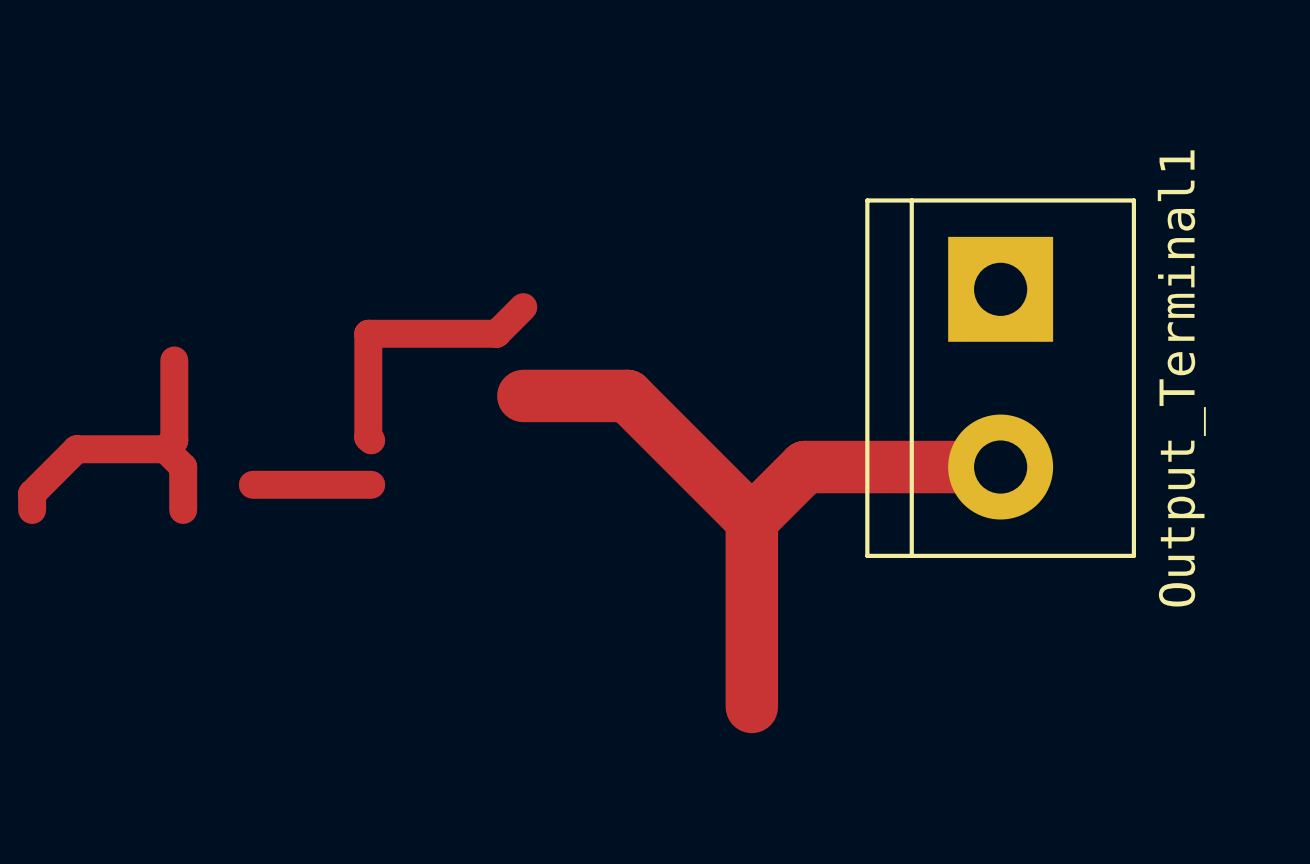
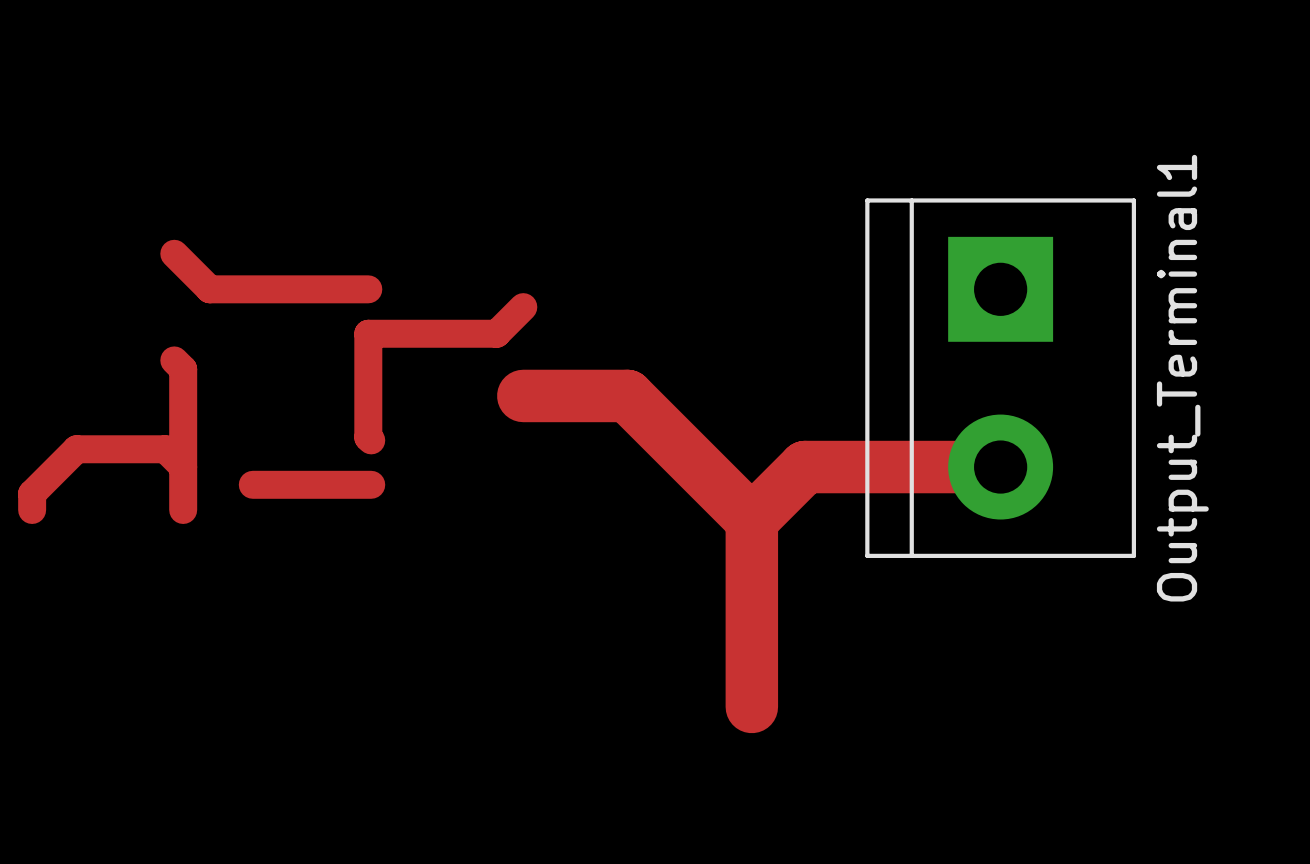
top track: none -> (174, 253) (209, 289) (368, 289)
top track: (174, 360) (174, 440) (165, 449) -> (174, 360) (183, 369) (183, 467)

